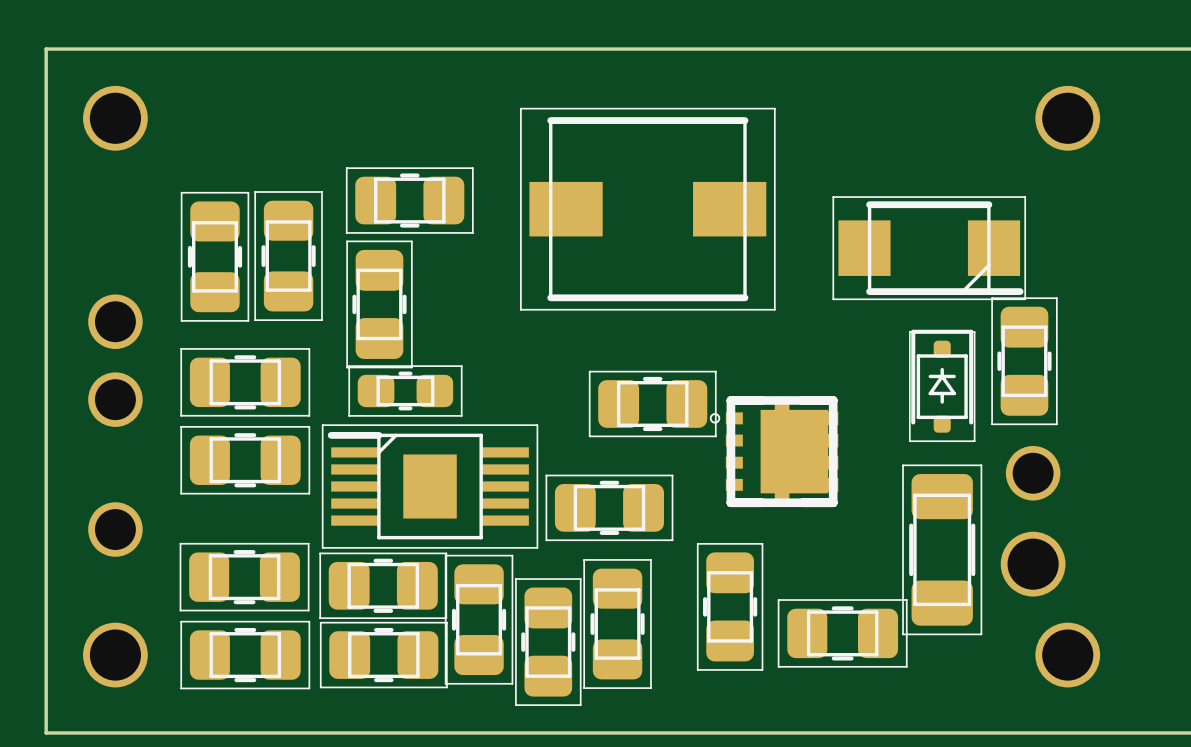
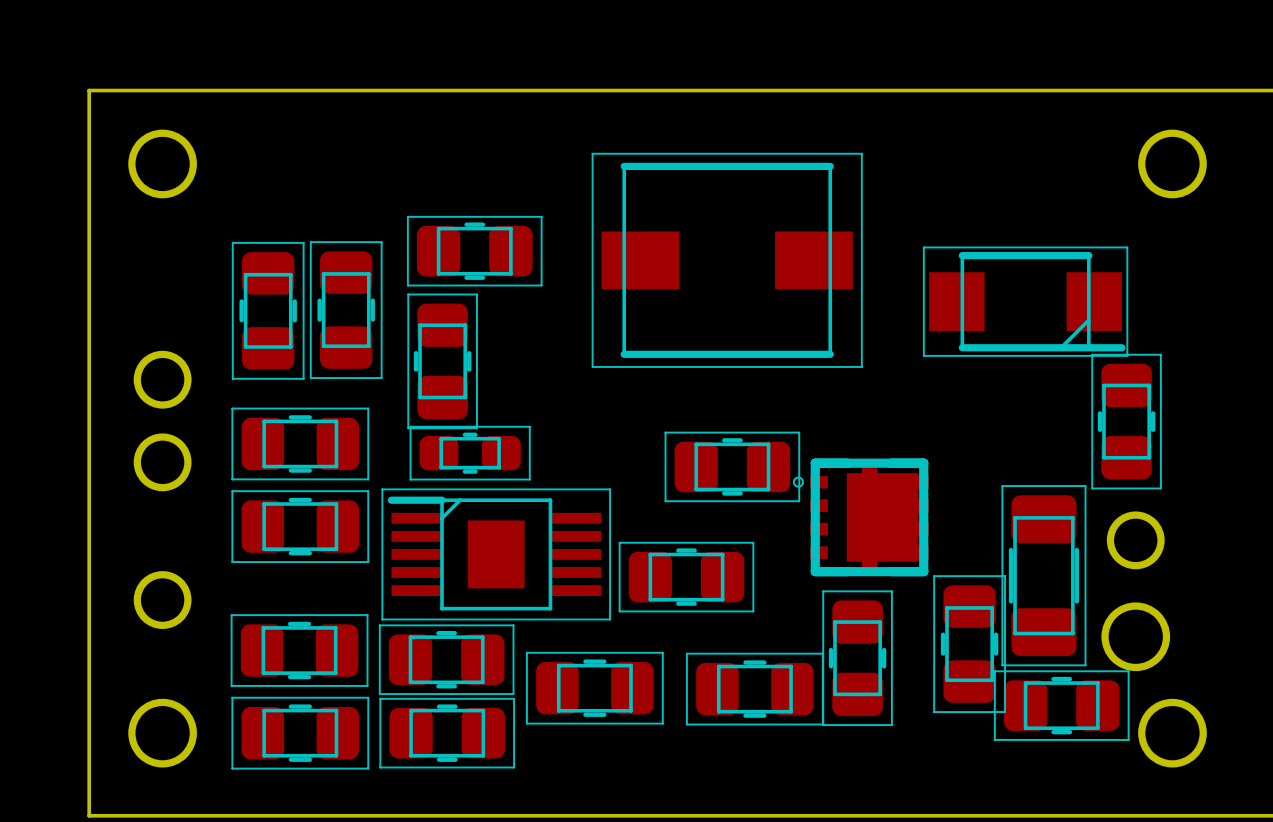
part: (942, 385) -> none
part position: (942, 549) -> (1043, 575)
part position: (730, 606) -> (857, 658)
part: none -> (754, 689)
part rotation: 0° (479, 619) -> 90° clockwise (594, 688)
part: (617, 624) -> none
part: none -> (1061, 705)
part rotation: 0° (842, 633) -> 90° clockwise (969, 644)
part: (548, 642) -> none

